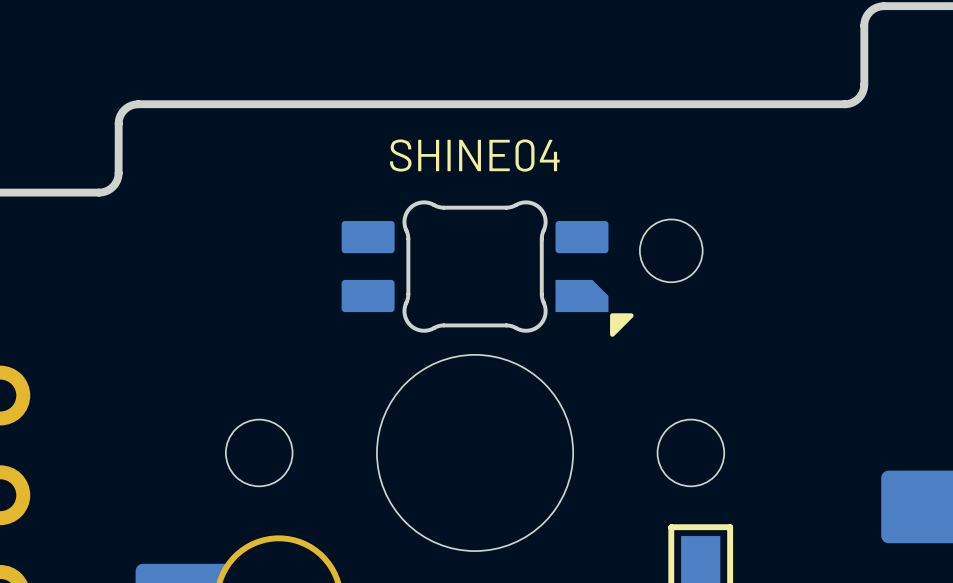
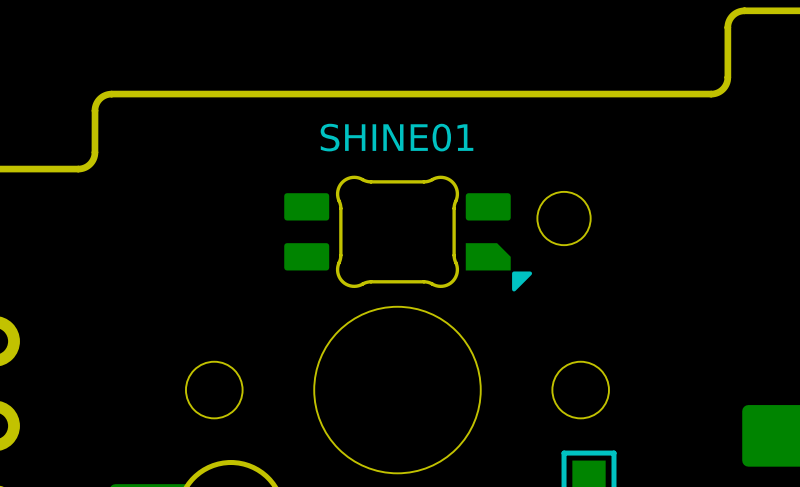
SHINE04 name: SHINE04 (474, 155) -> SHINE01 (397, 137)

